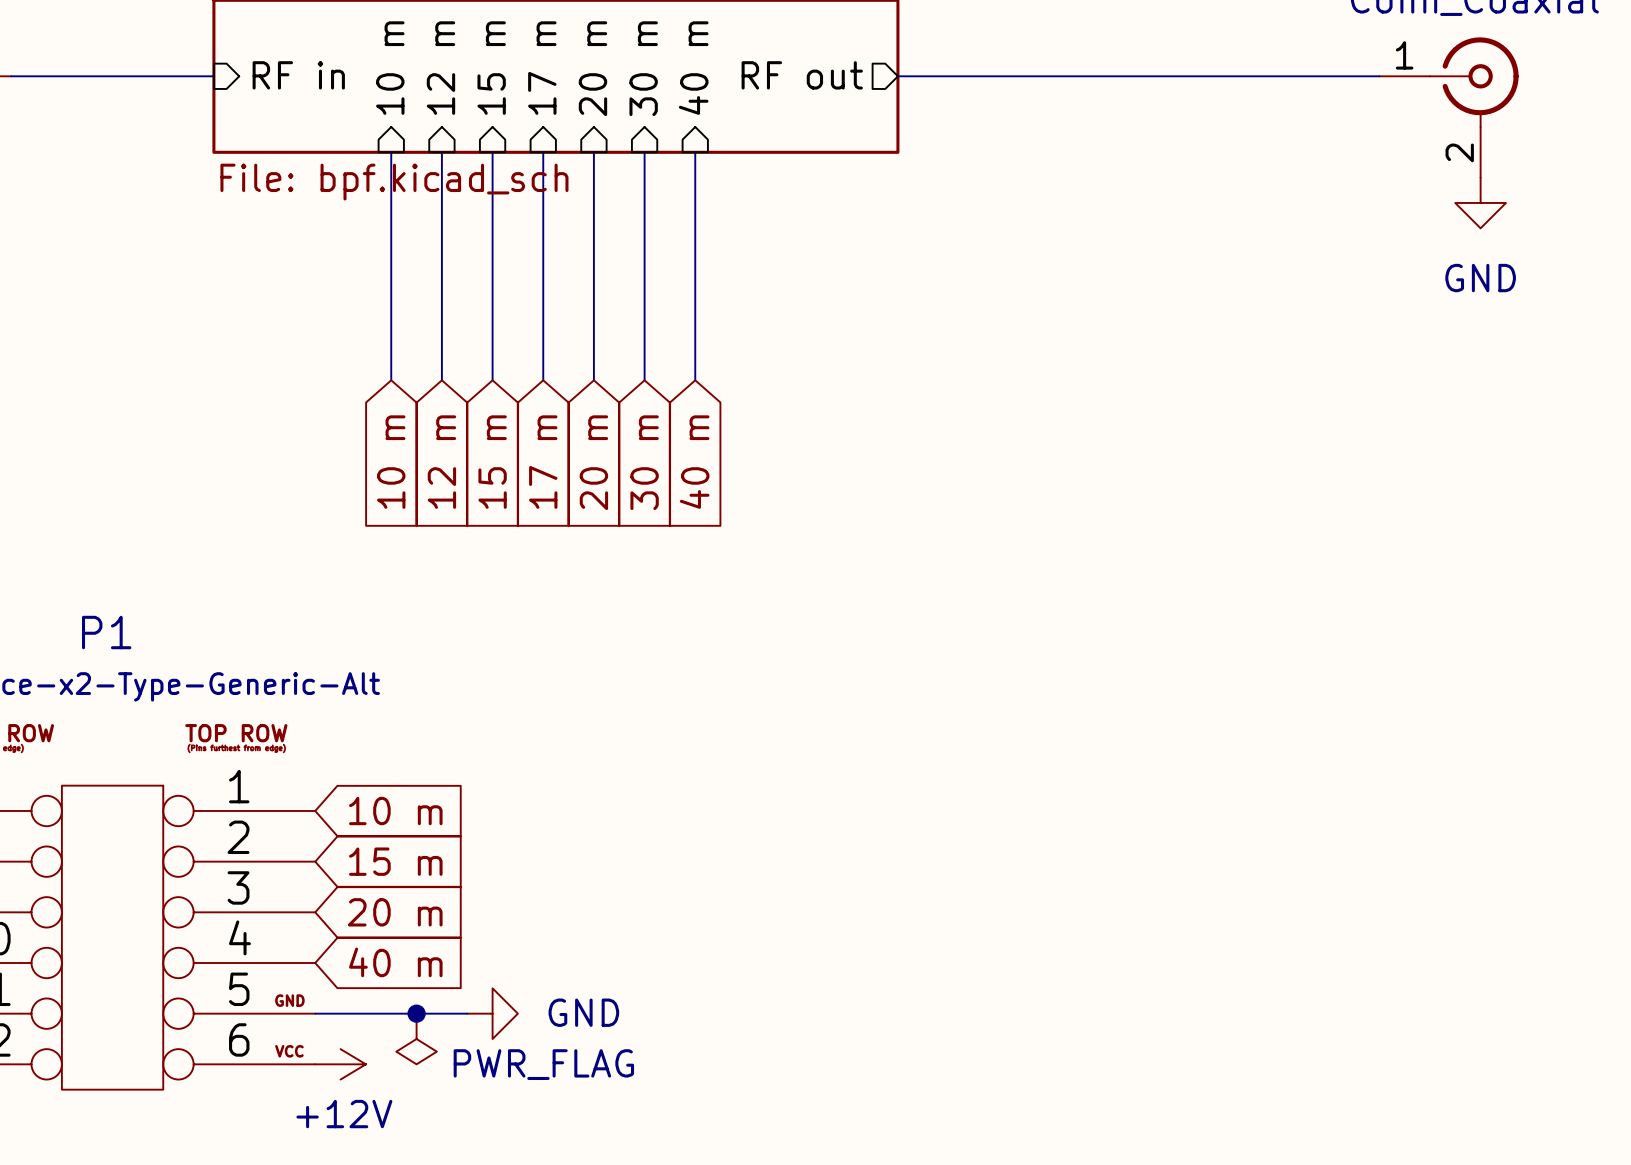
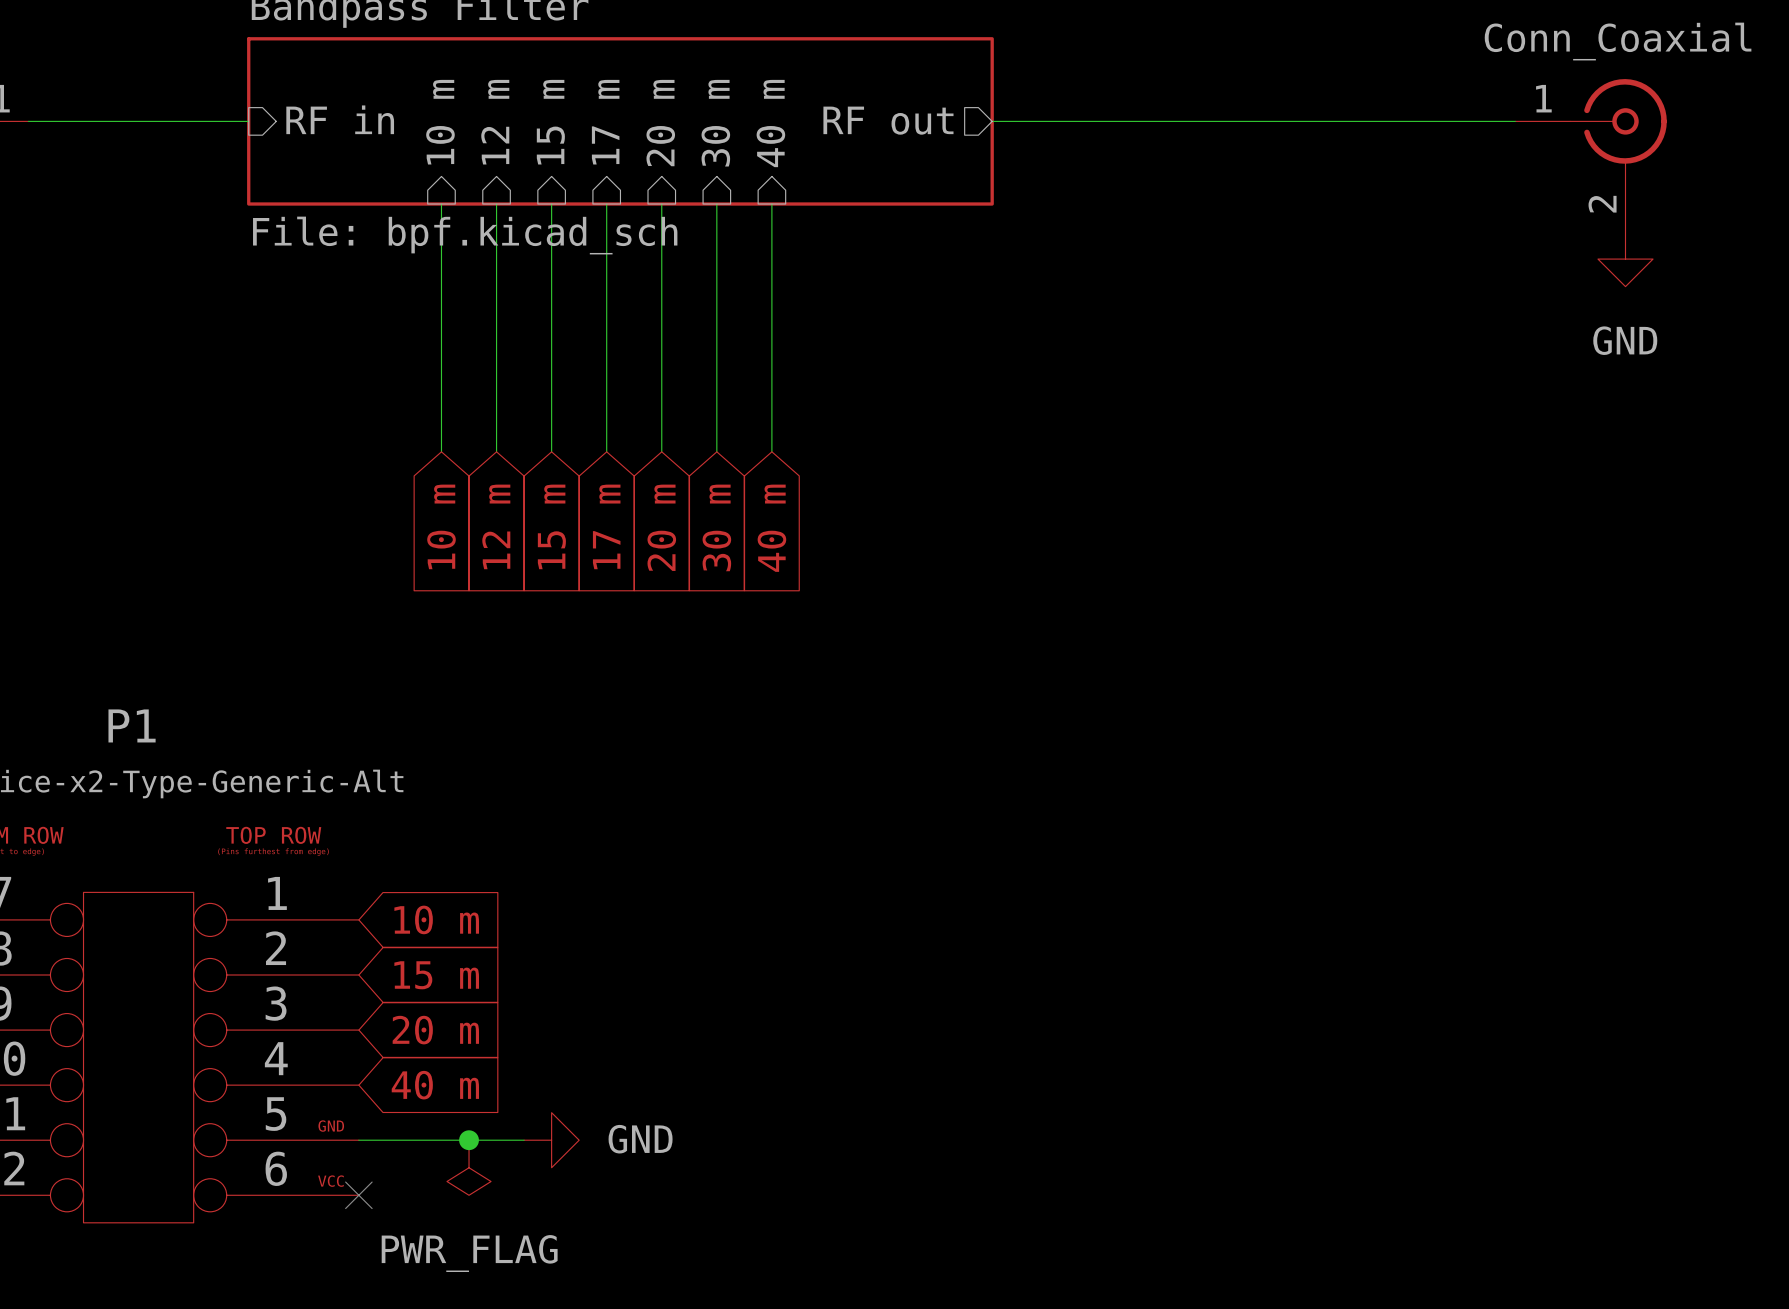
no-connect mark: none -> (358, 1195)
power symbol: +12V (340, 1064) -> none
power symbol text position: PWR_FLAG (543, 1064) -> PWR_FLAG (469, 1253)

